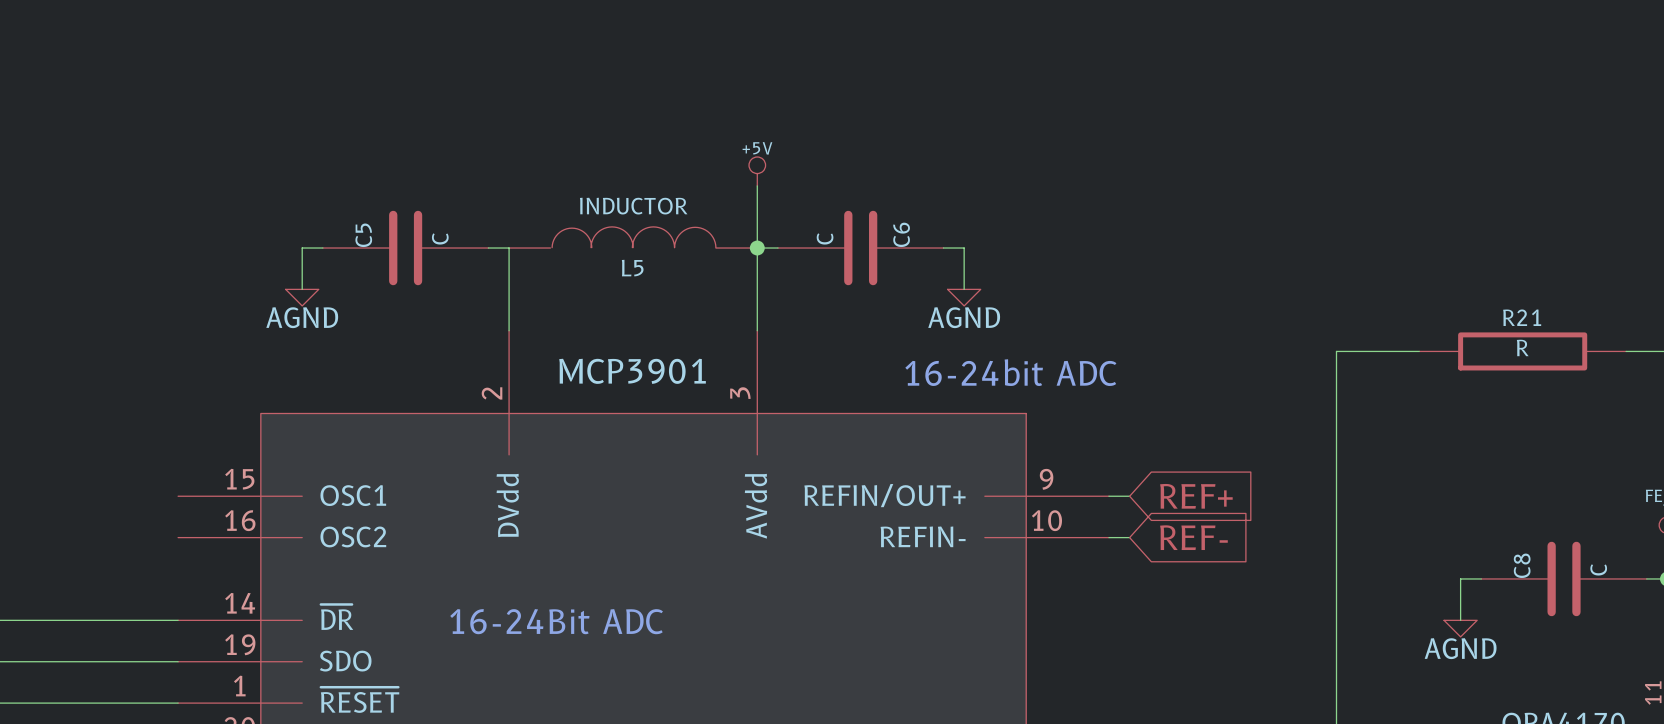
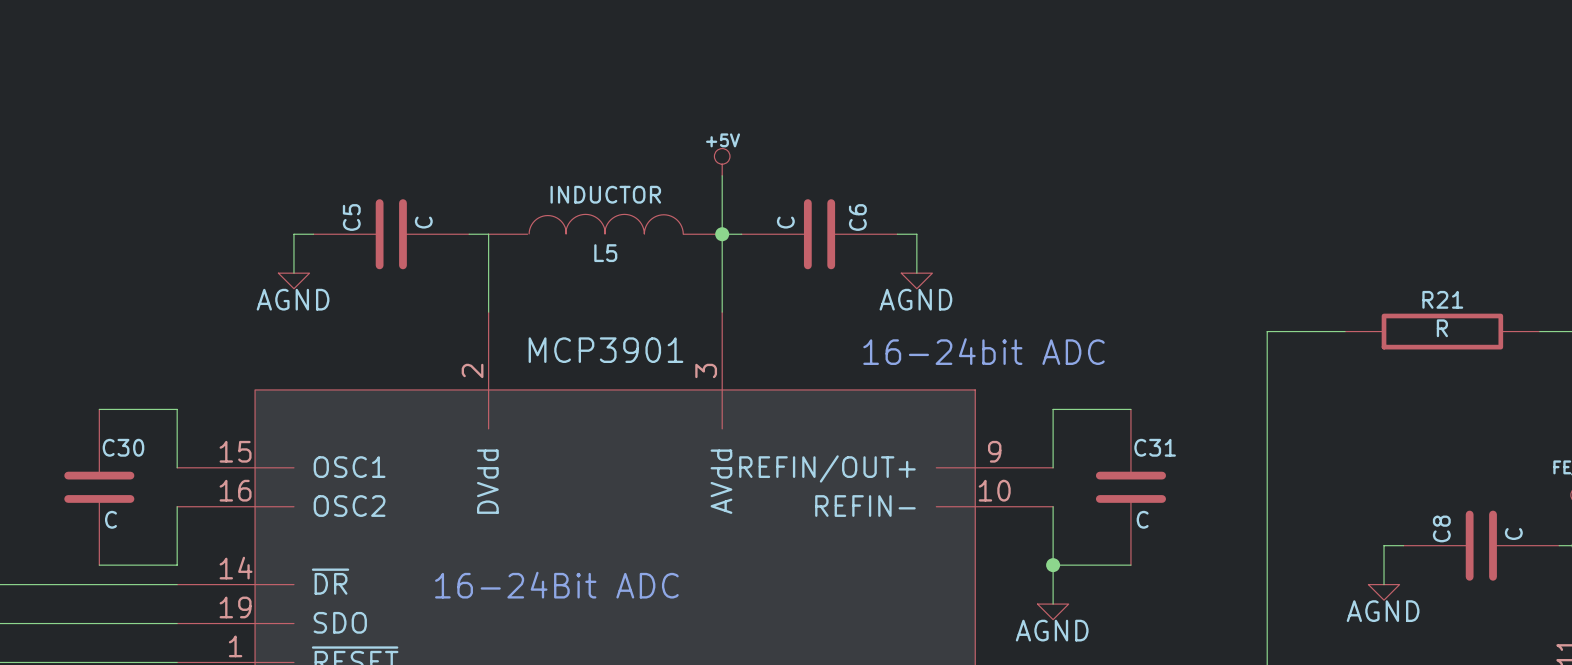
wire: none -> (99, 409) (177, 409) (177, 467)
wire: (1108, 496) (1129, 496) -> (1053, 467) (1053, 409) (1130, 409)
global label: REF+ (1196, 496) -> none
C30: none -> C (99, 487)
C31: none -> C (1130, 487)
wire: none -> (177, 506) (177, 565) (99, 565)
wire: (1108, 537) (1129, 537) -> (1053, 506) (1053, 604)
global label: REF- (1193, 537) -> none
wire: none -> (1053, 565) (1130, 565)
junction: none -> (1053, 565)
power symbol: none -> AGND (1053, 611)

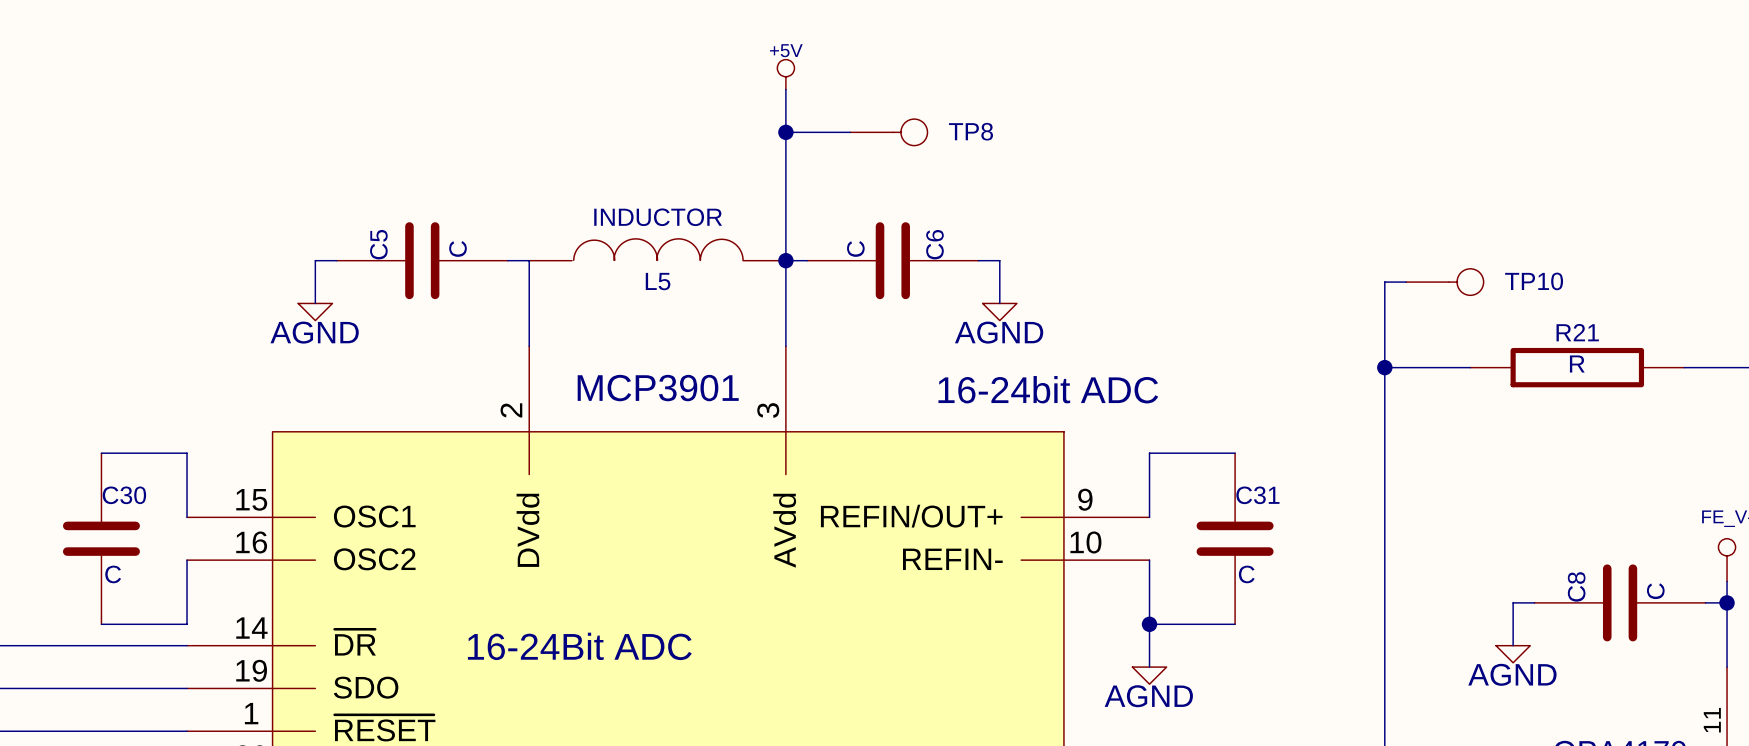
wire: none -> (785, 89) (785, 196)
wire: none -> (785, 132) (850, 132)
junction: none -> (785, 132)
TP8: none -> (888, 132)
power symbol position: +5V (722, 162) -> +5V (785, 74)
wire: none -> (1406, 282) (1384, 282) (1384, 367)
TP10: none -> (1444, 282)
junction: none -> (1384, 367)

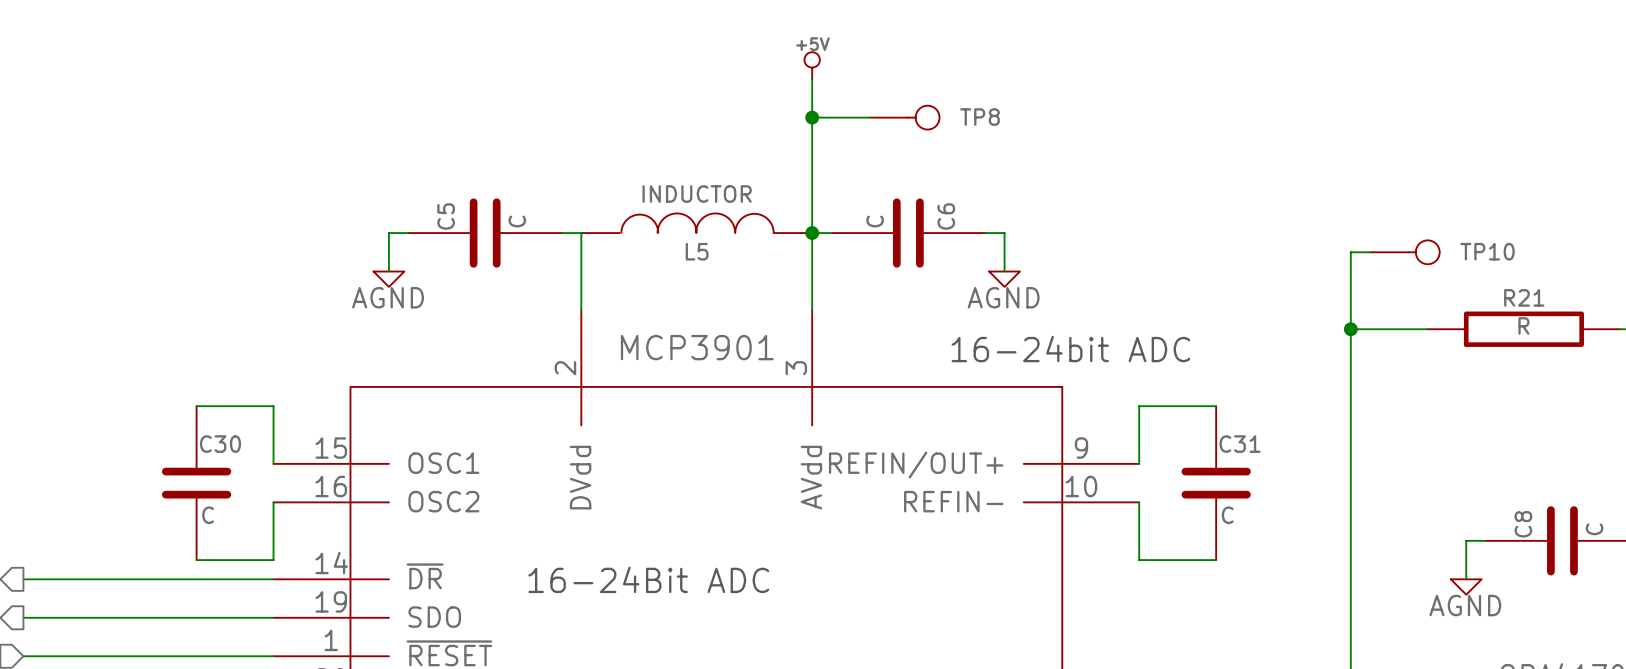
wire: (1149, 624) (1149, 667) -> none
junction: (1149, 624) -> none
power symbol: AGND (1149, 675) -> none

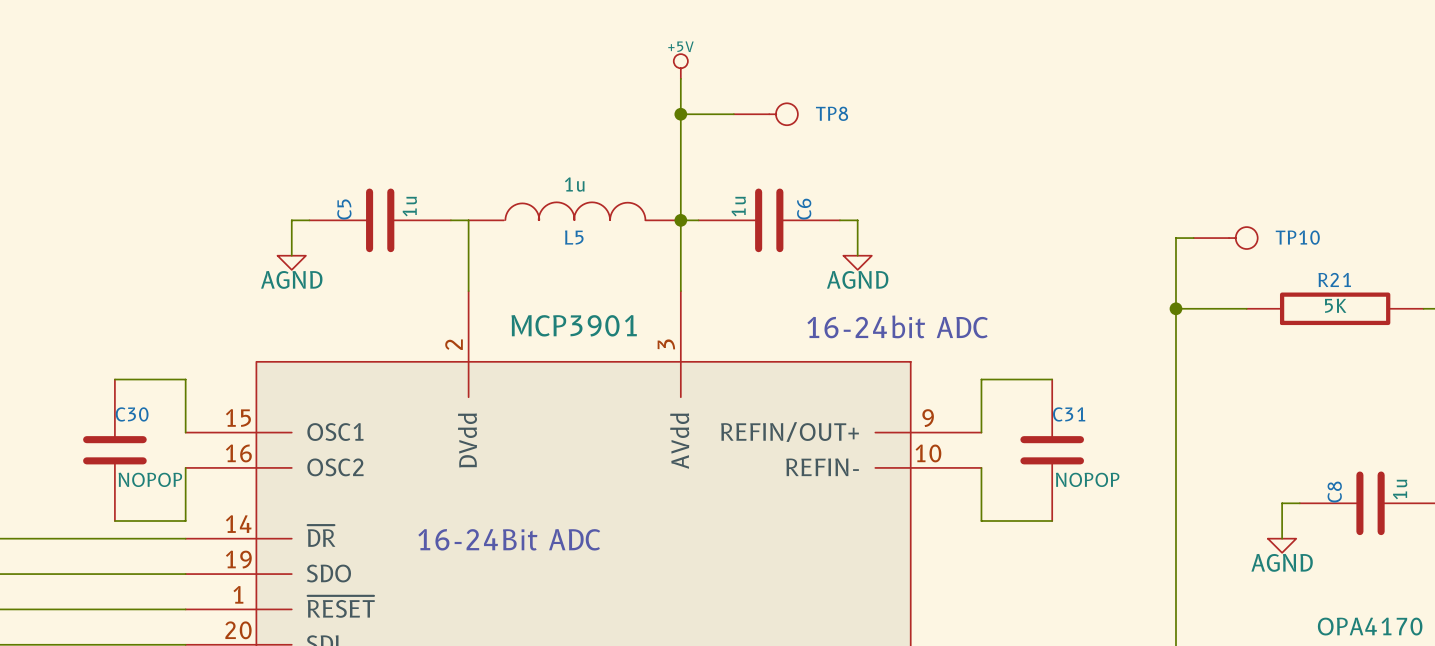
L5 value: INDUCTOR (697, 194) -> 1u (574, 184)
C5 value: C (517, 221) -> 1u (409, 206)
C6 value: C (875, 221) -> 1u (738, 206)
R21 value: R (1523, 325) -> 5K (1335, 305)
C30 value: C (208, 515) -> NOPOP (150, 479)
C31 value: C (1227, 515) -> NOPOP (1087, 479)
C8 value: C (1594, 529) -> 1u (1400, 489)

